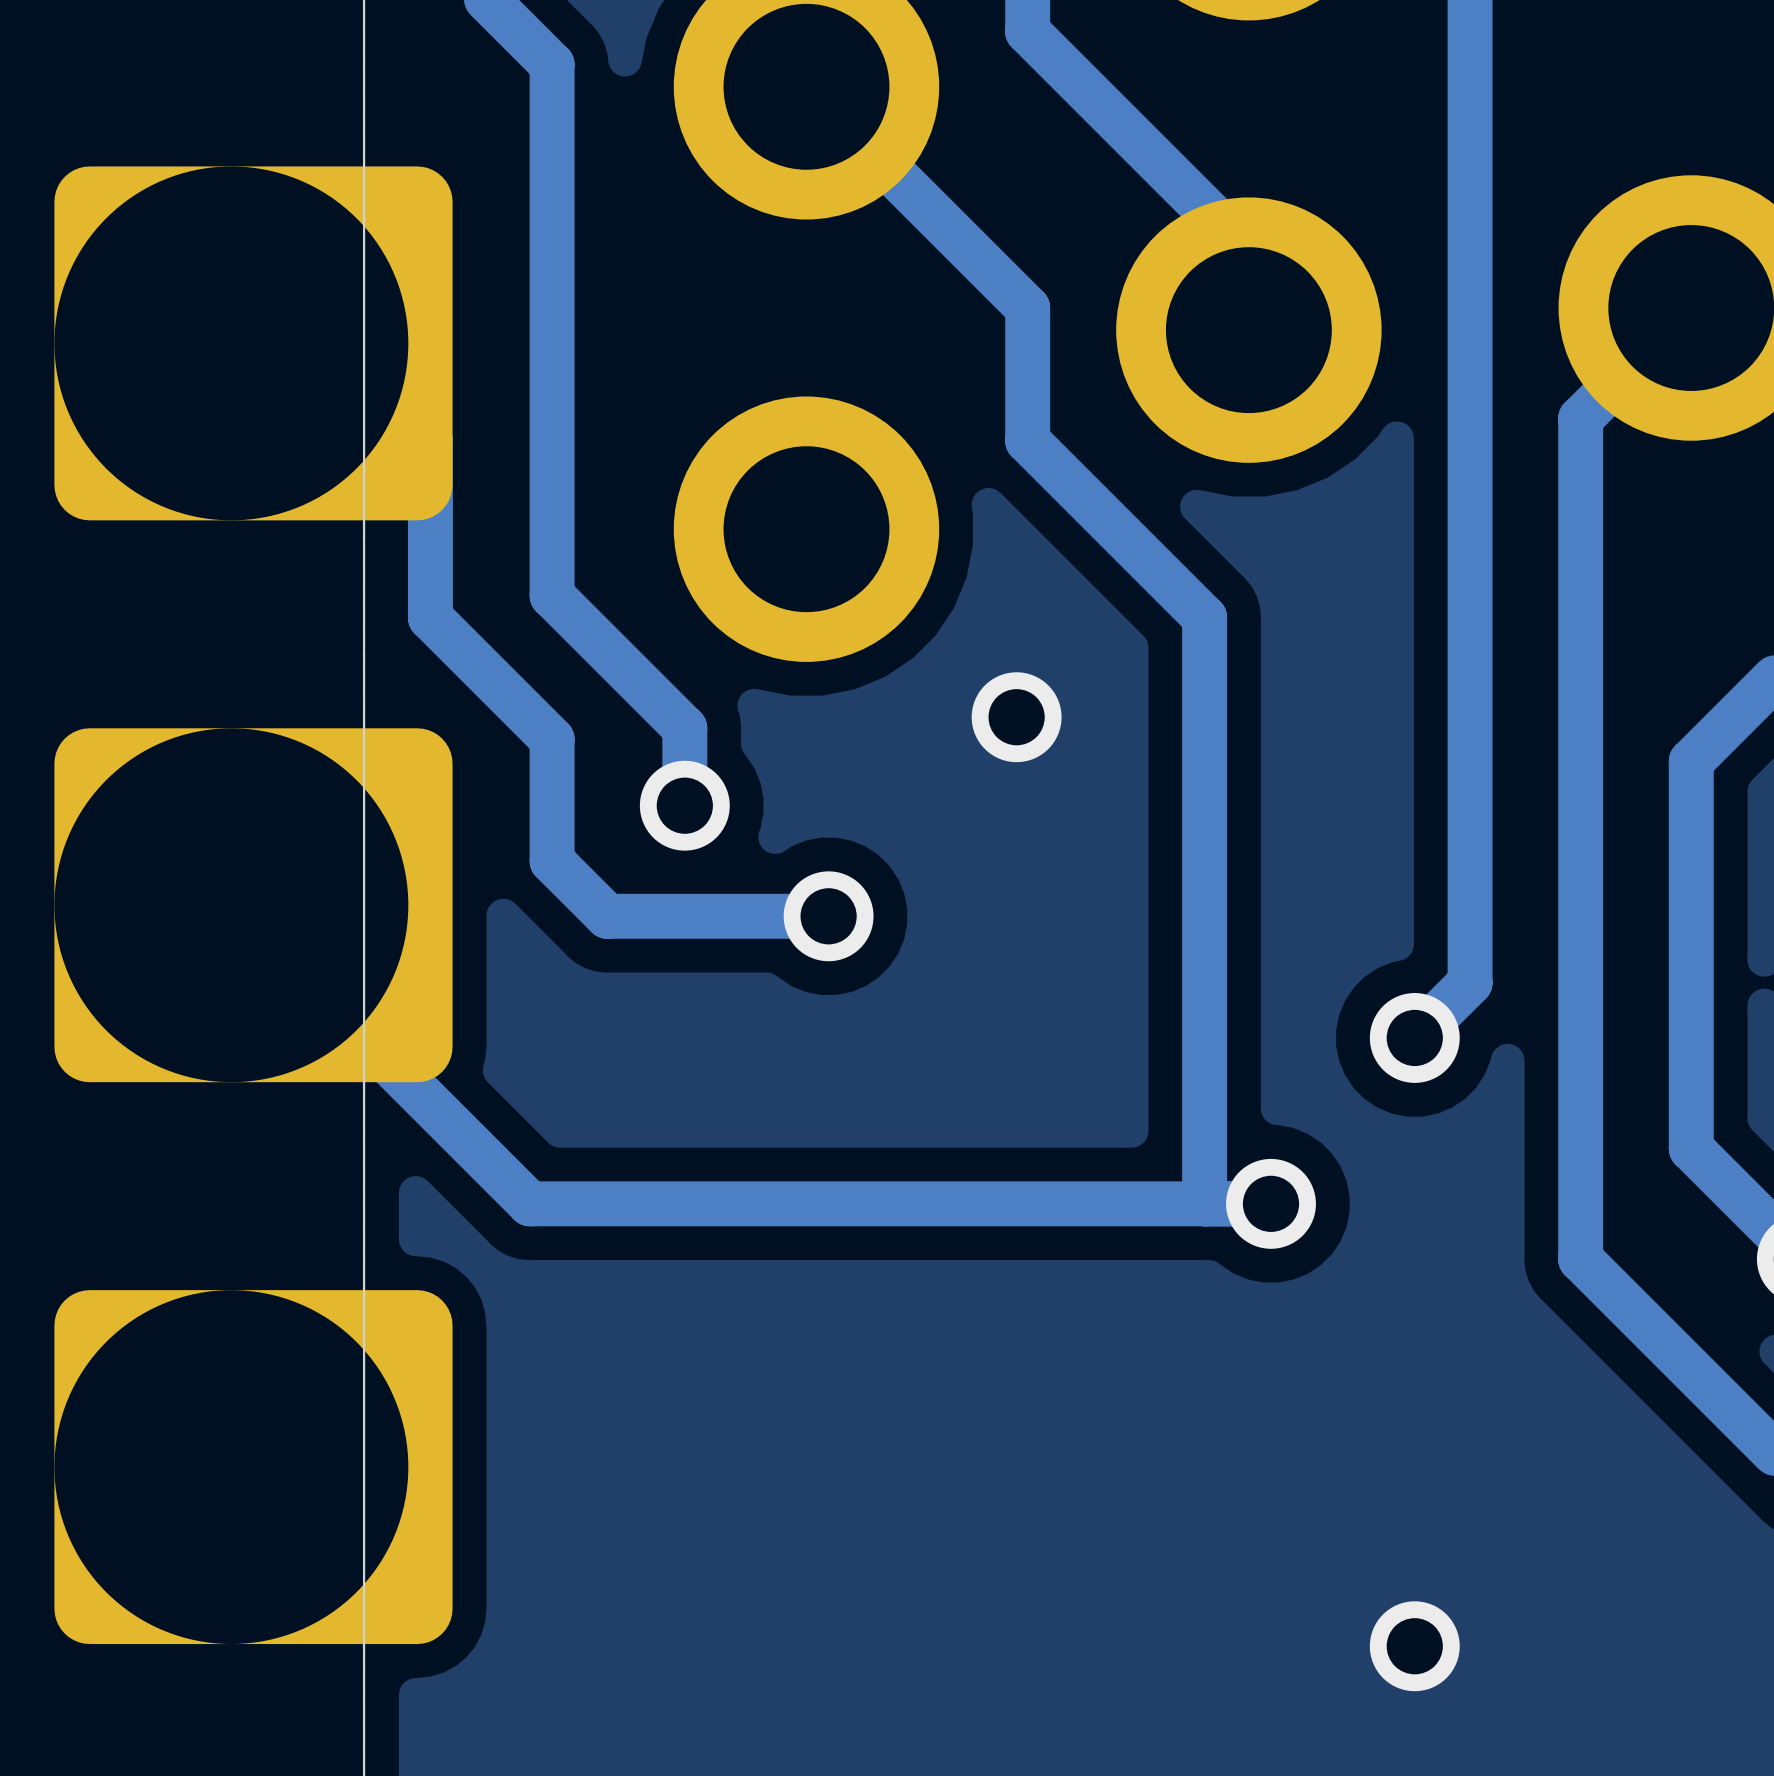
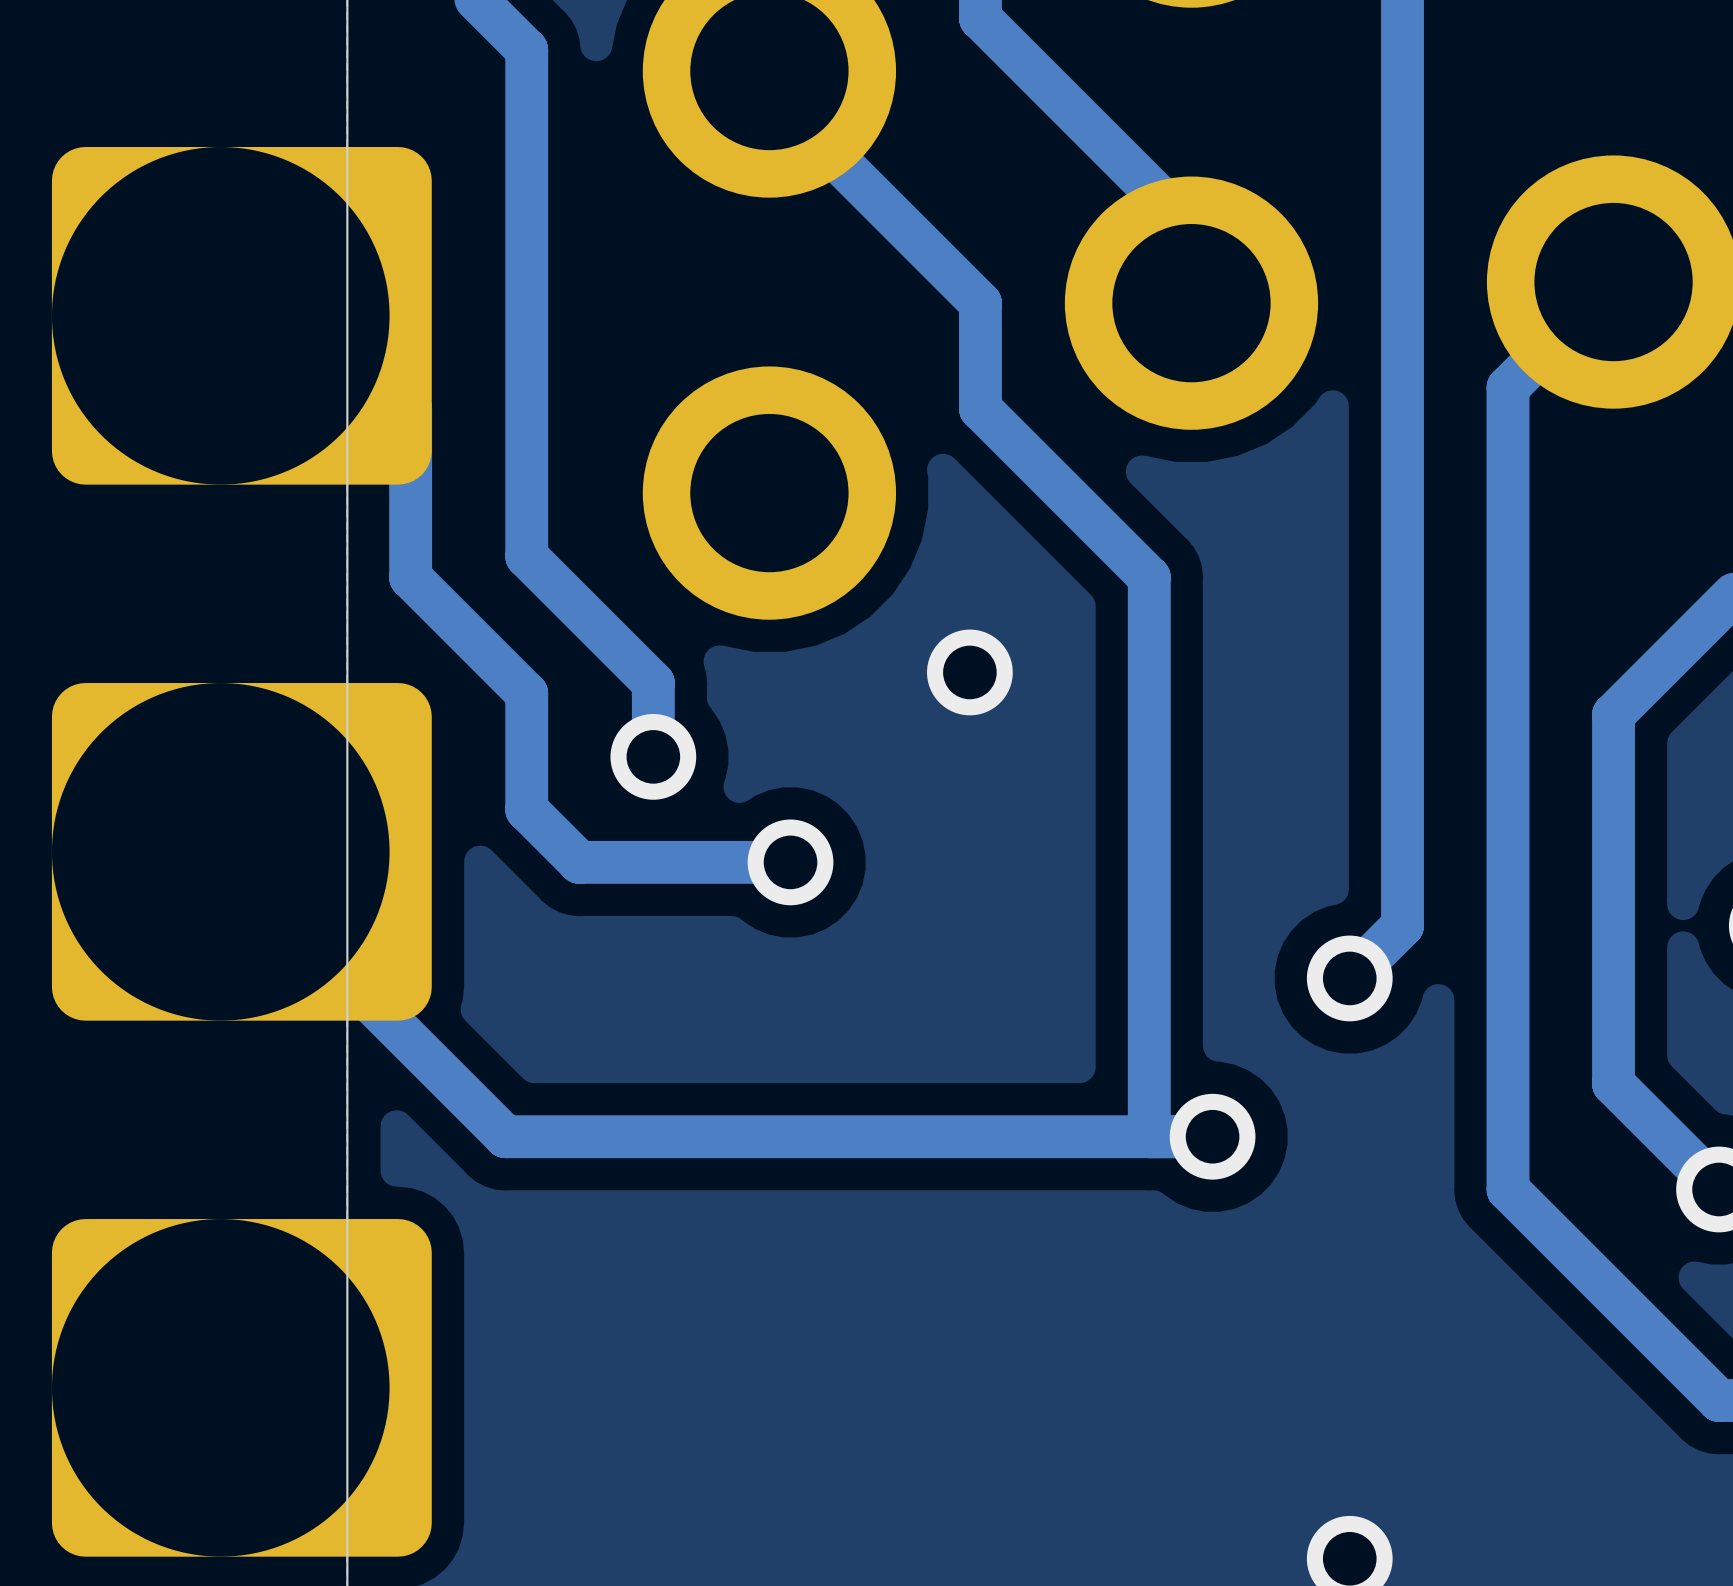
track: (806, 86) (1027, 308) (1027, 330) -> (769, 92) (980, 303)

